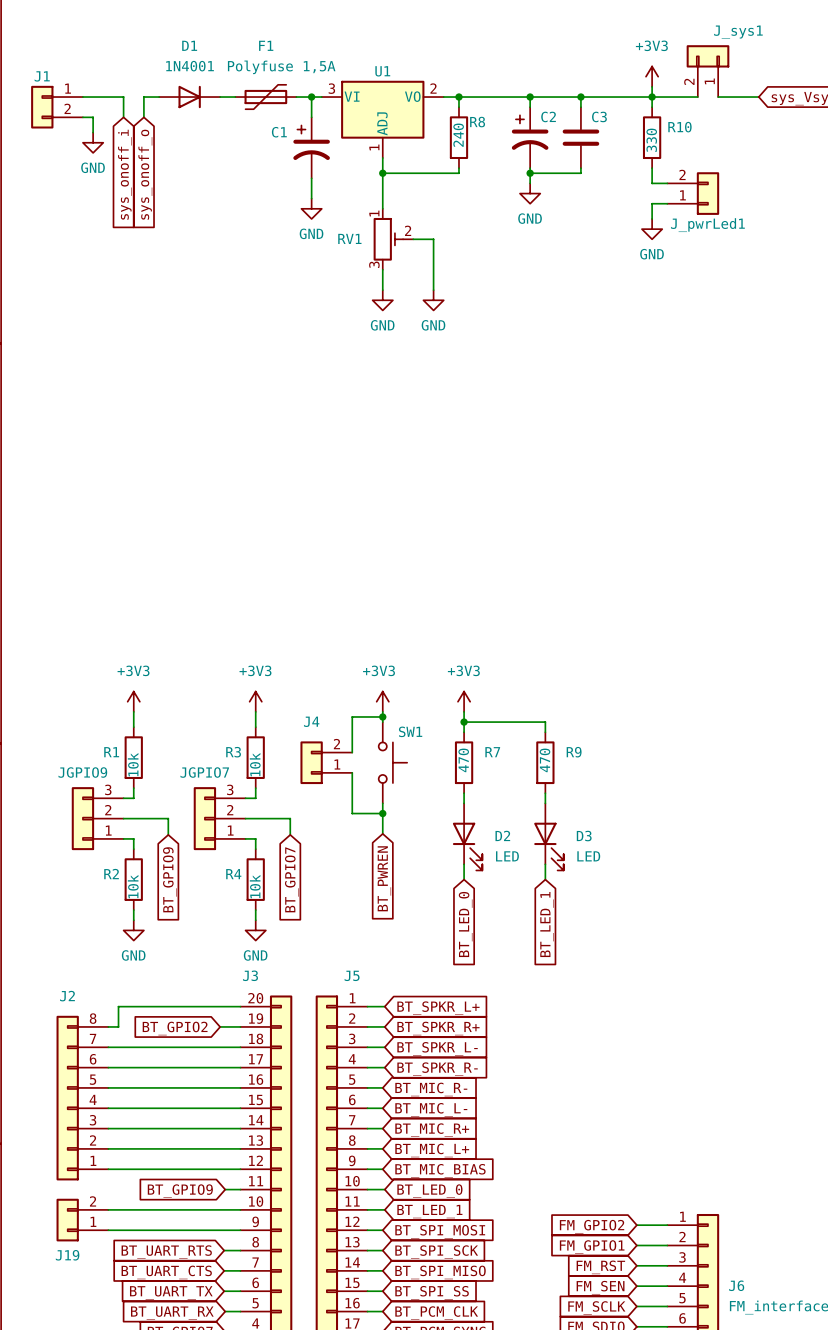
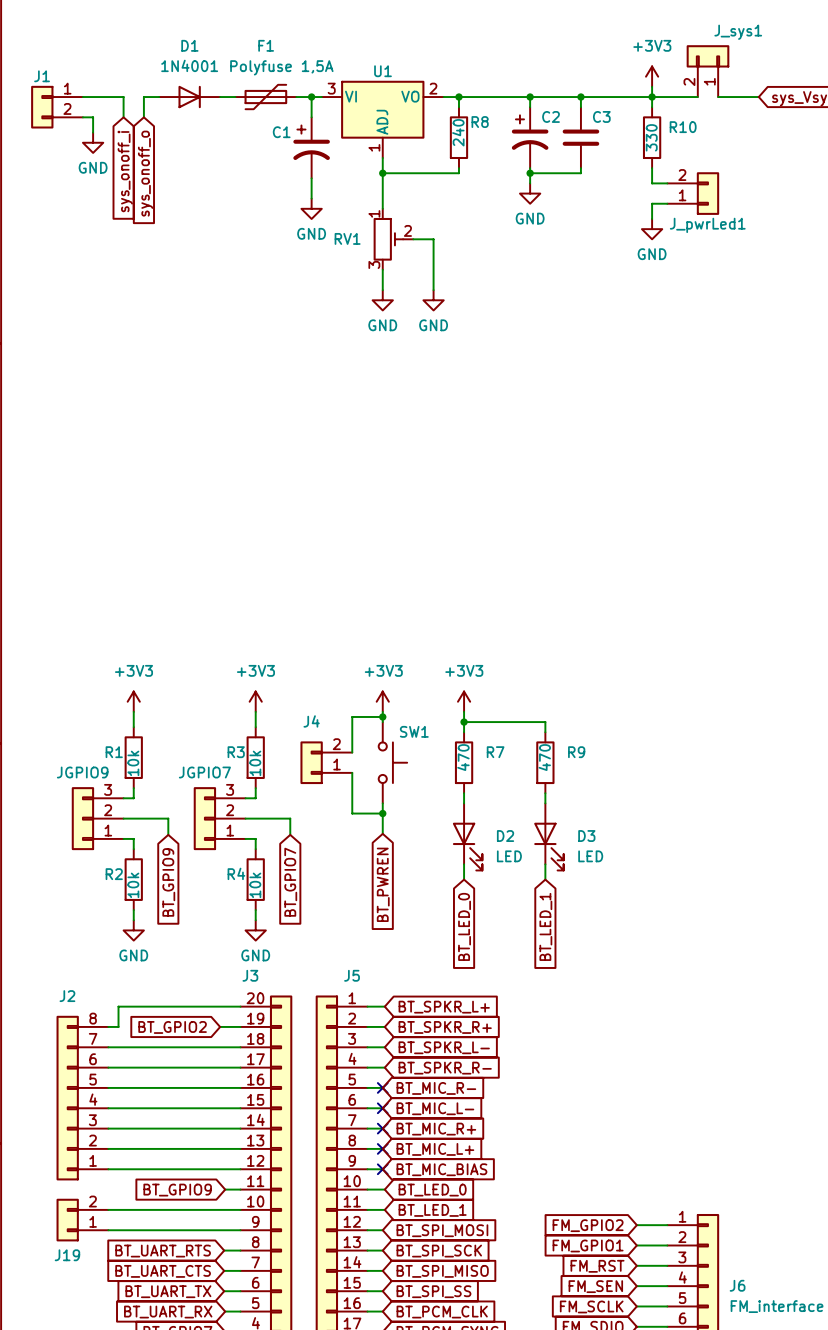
no-connect mark: none -> (382, 1087)
no-connect mark: none -> (382, 1108)
no-connect mark: none -> (382, 1128)
no-connect mark: none -> (382, 1148)
no-connect mark: none -> (382, 1169)

